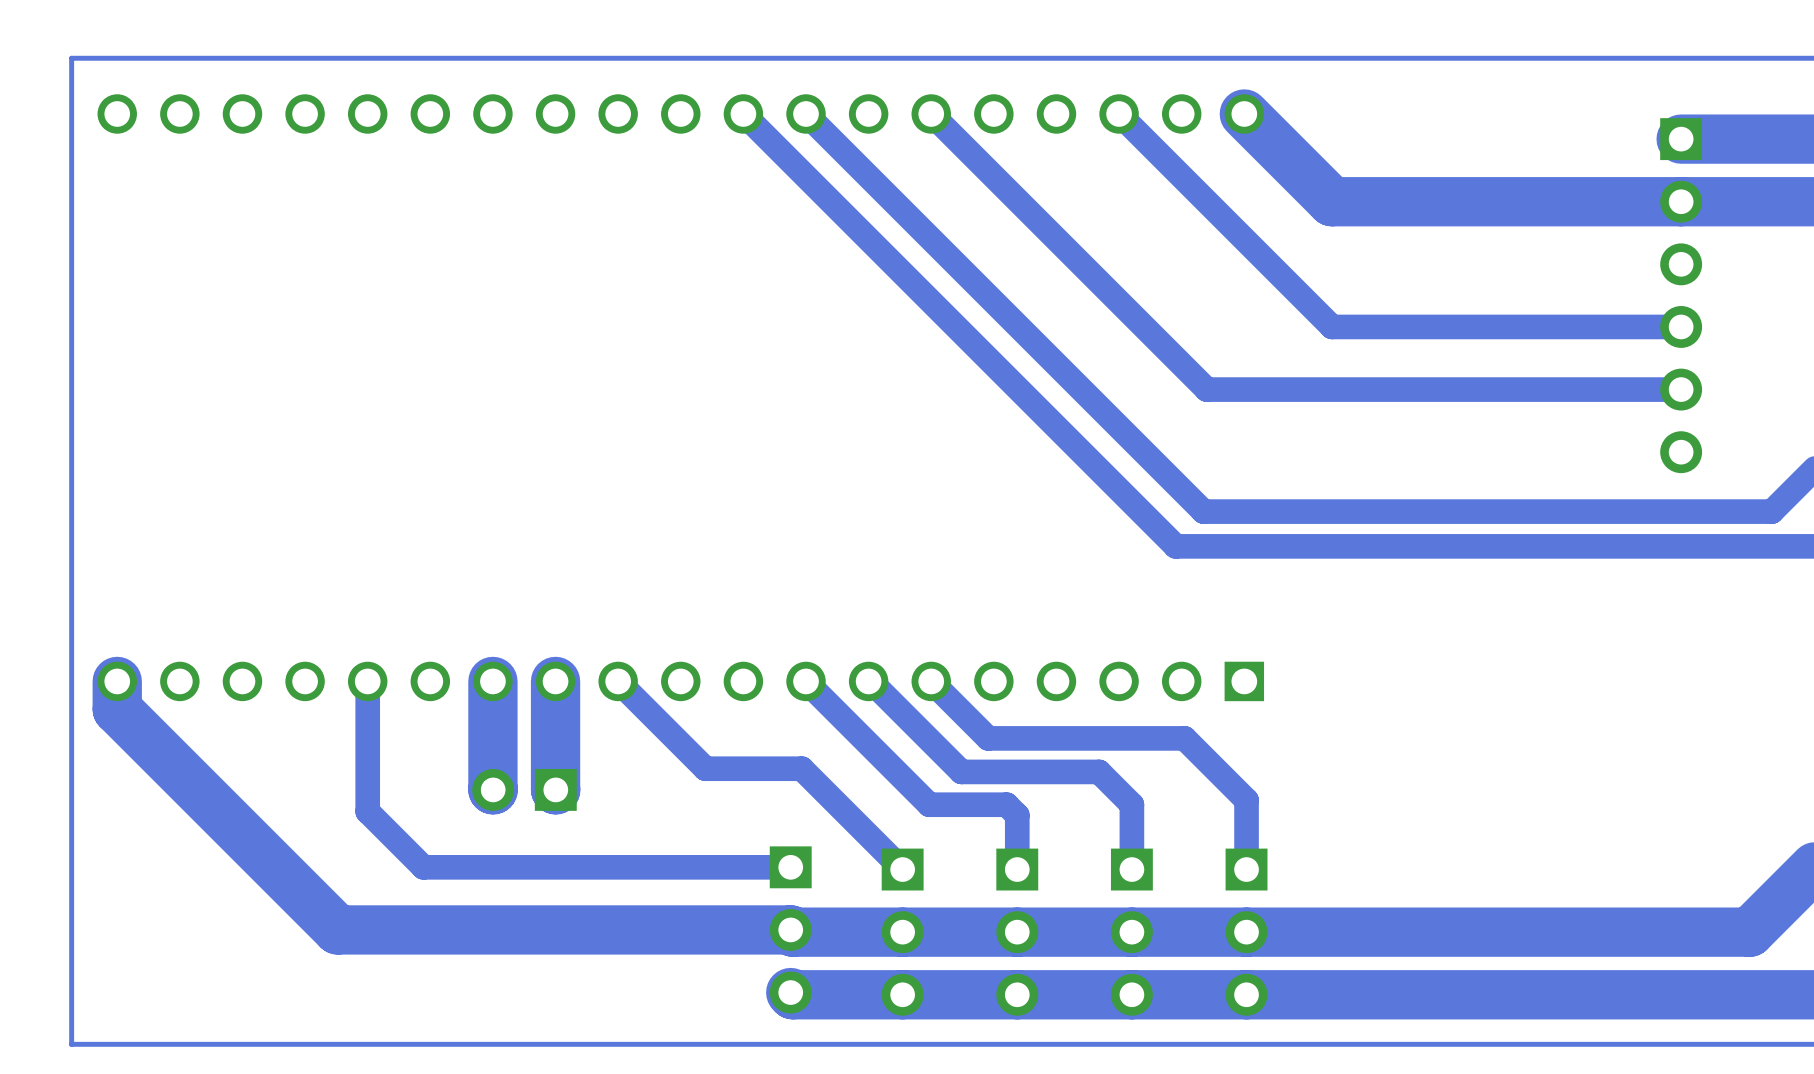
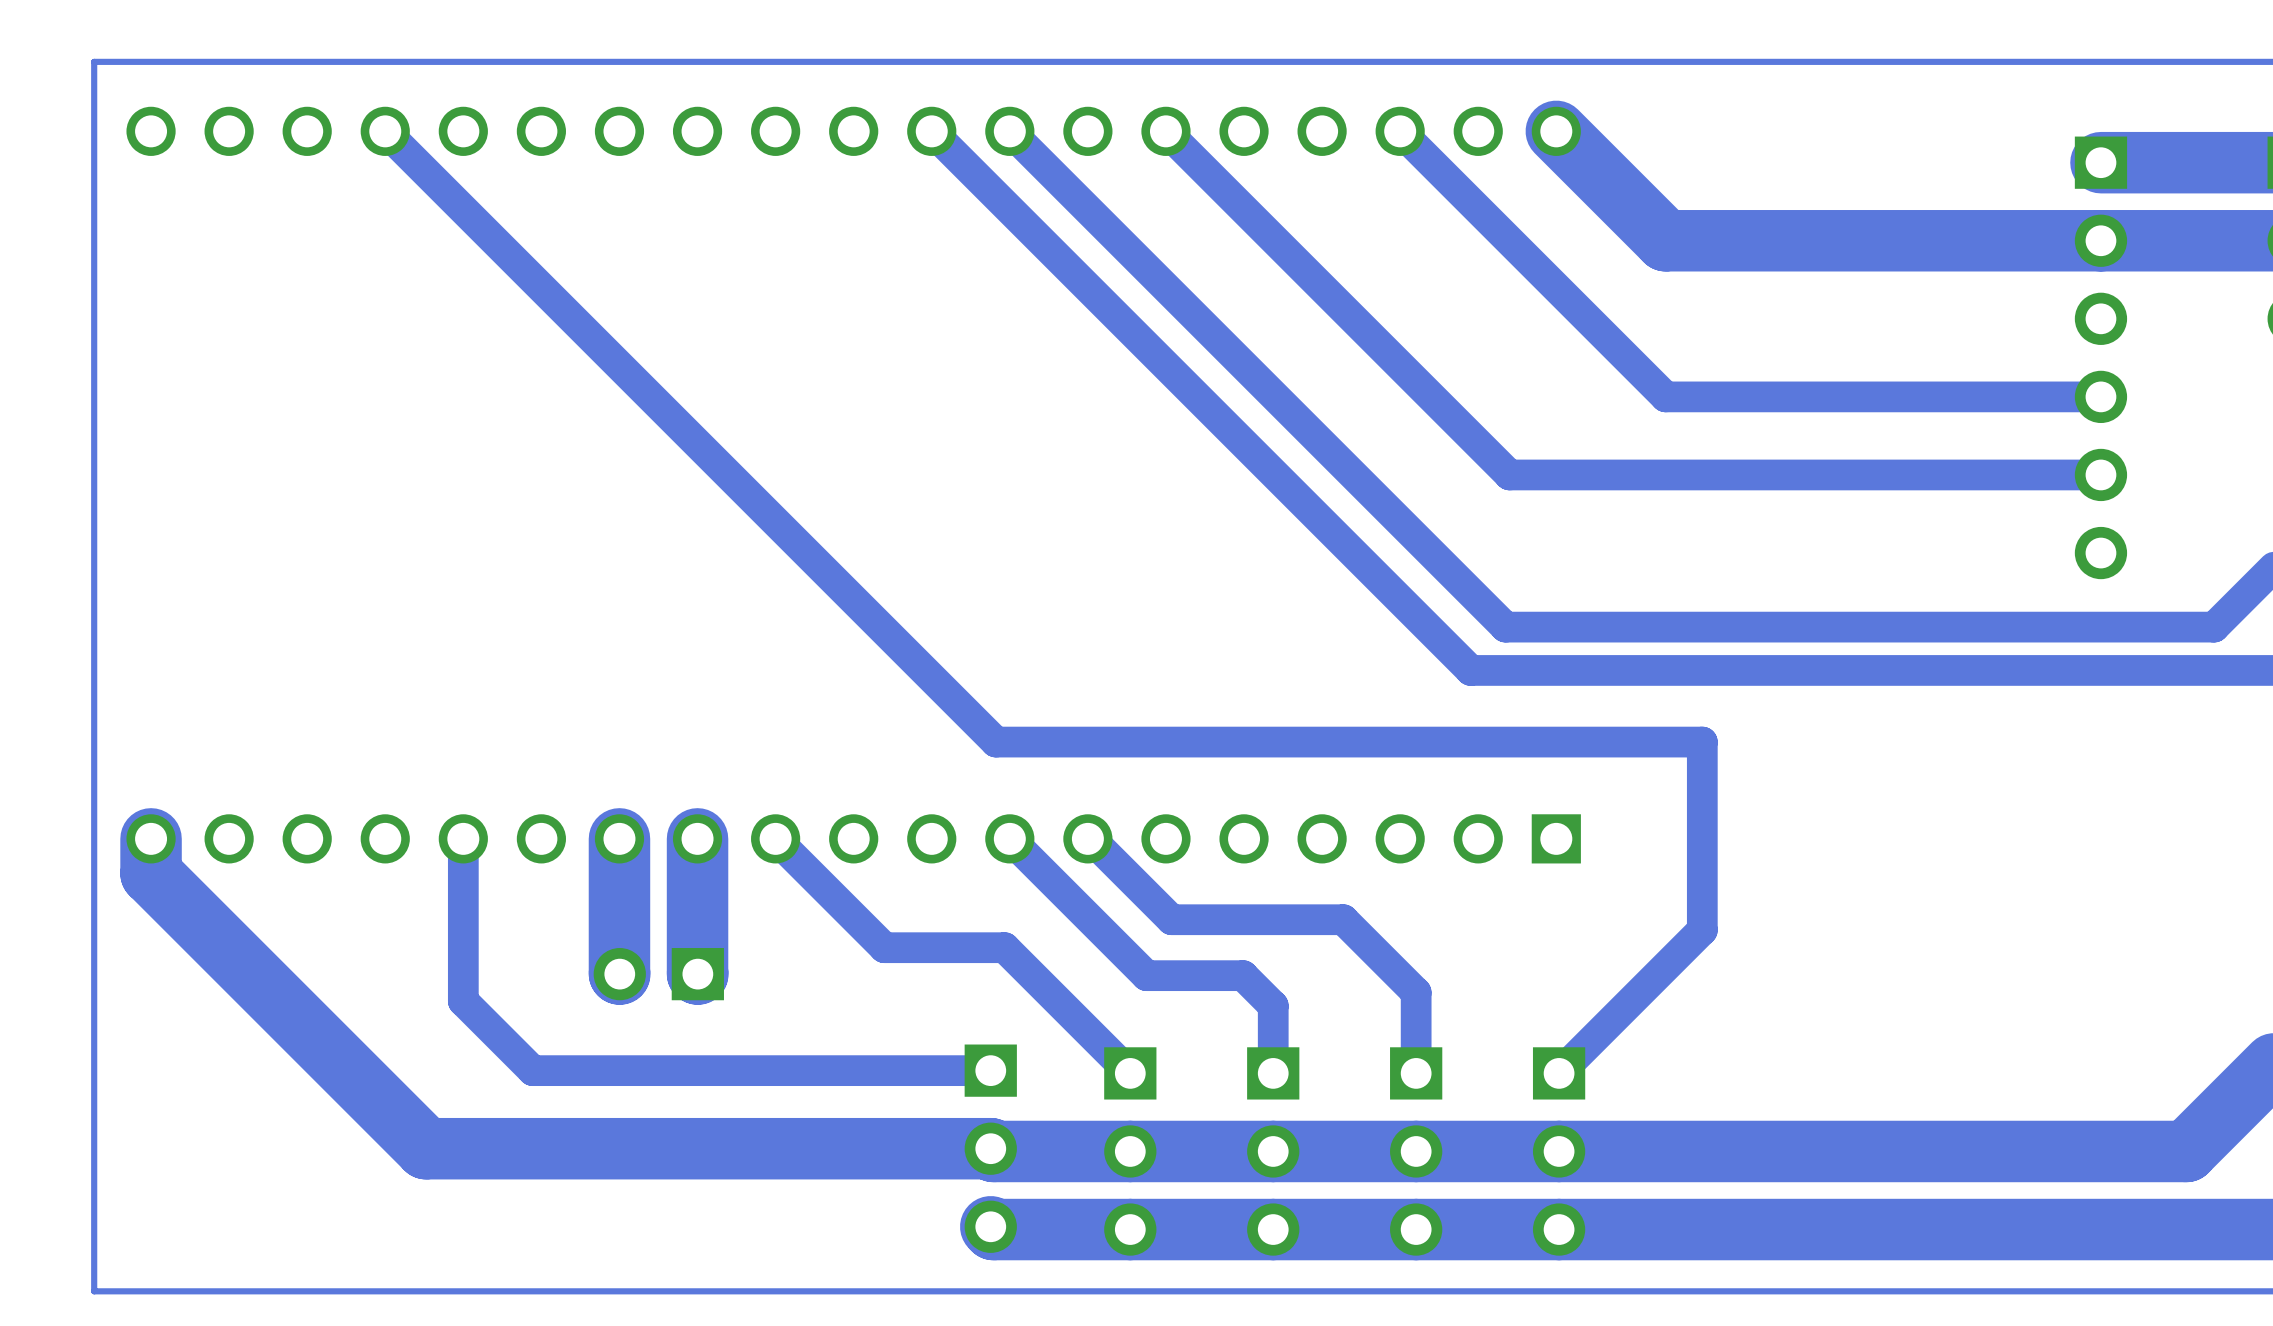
track: (931, 681) (988, 738) (1184, 738) (1246, 800) (1246, 869) -> (385, 131) (995, 742) (1702, 742) (1702, 930) (1559, 1073)
track: (935, 746) (961, 771) (1099, 771) -> (1171, 919) (1343, 919) (1375, 951)
track: (915, 791) (929, 804) (1006, 804) -> (1146, 975) (1243, 975) (1260, 992)

